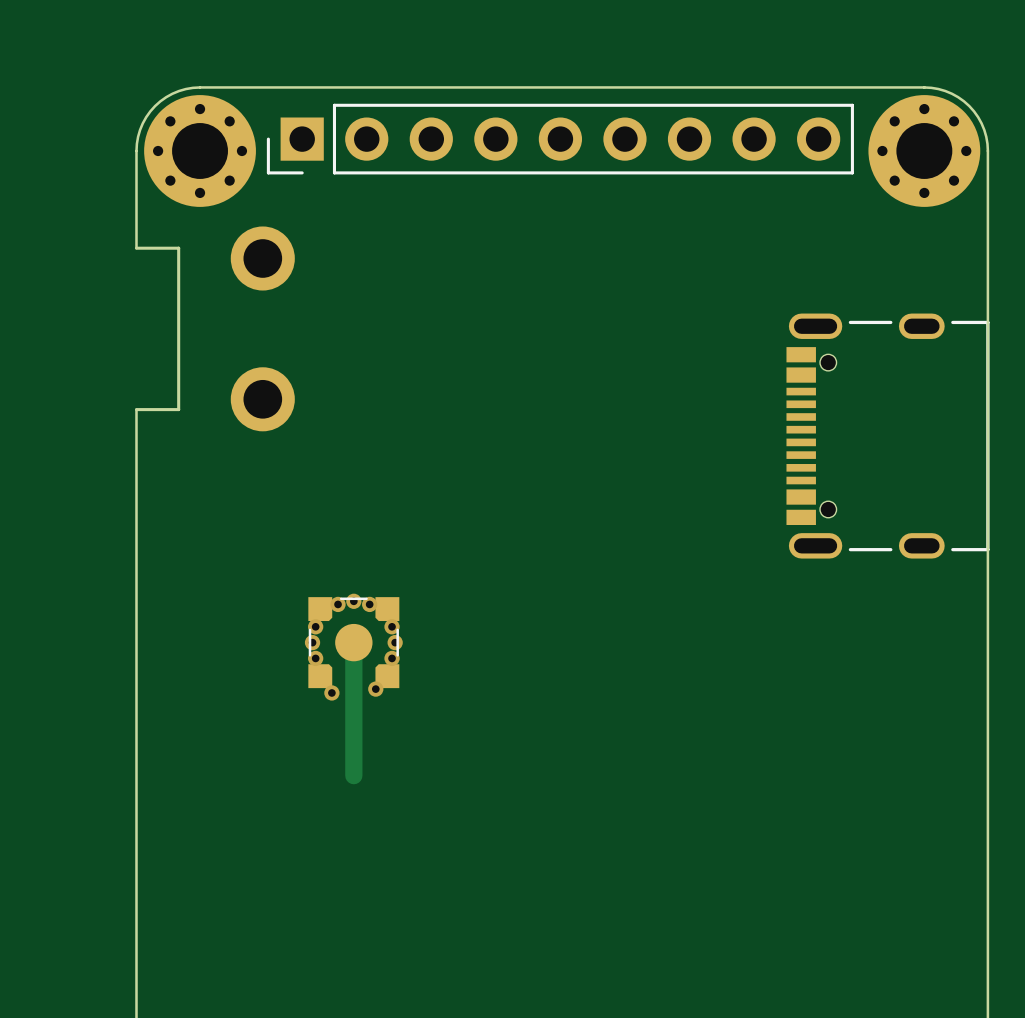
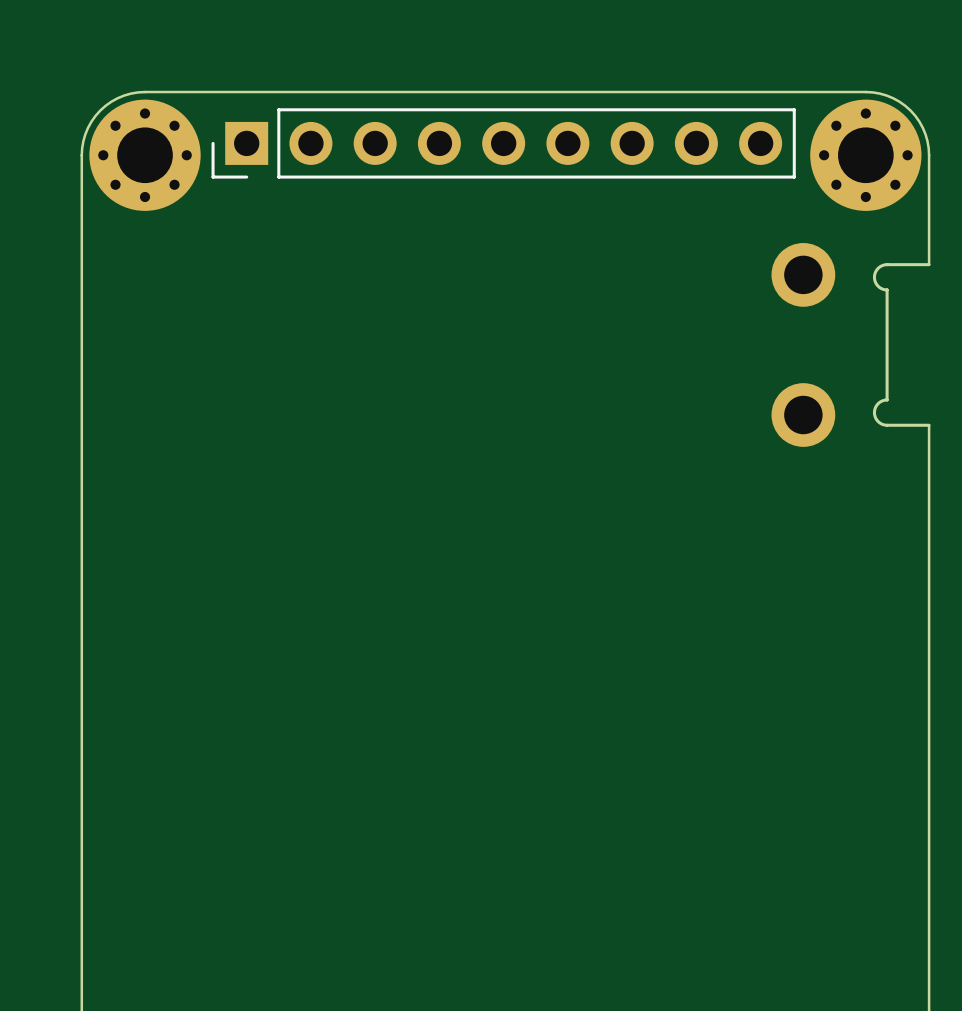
board edge: none -> (81, 252) (81, 412)
board edge: (987, 260) (987, 422) -> none
part: (214, 328) -> none
part: none -> (851, 344)
part: (887, 436) -> none
via: (353, 601) -> none
via: (338, 604) -> none
via: (369, 604) -> none
via: (315, 626) -> none
via: (392, 626) -> none
via: (312, 642) -> none
track: (353, 642) (353, 775) -> none
part: (353, 642) -> none
via: (395, 642) -> none
via: (315, 658) -> none
via: (392, 658) -> none
via: (375, 689) -> none
via: (331, 692) -> none

